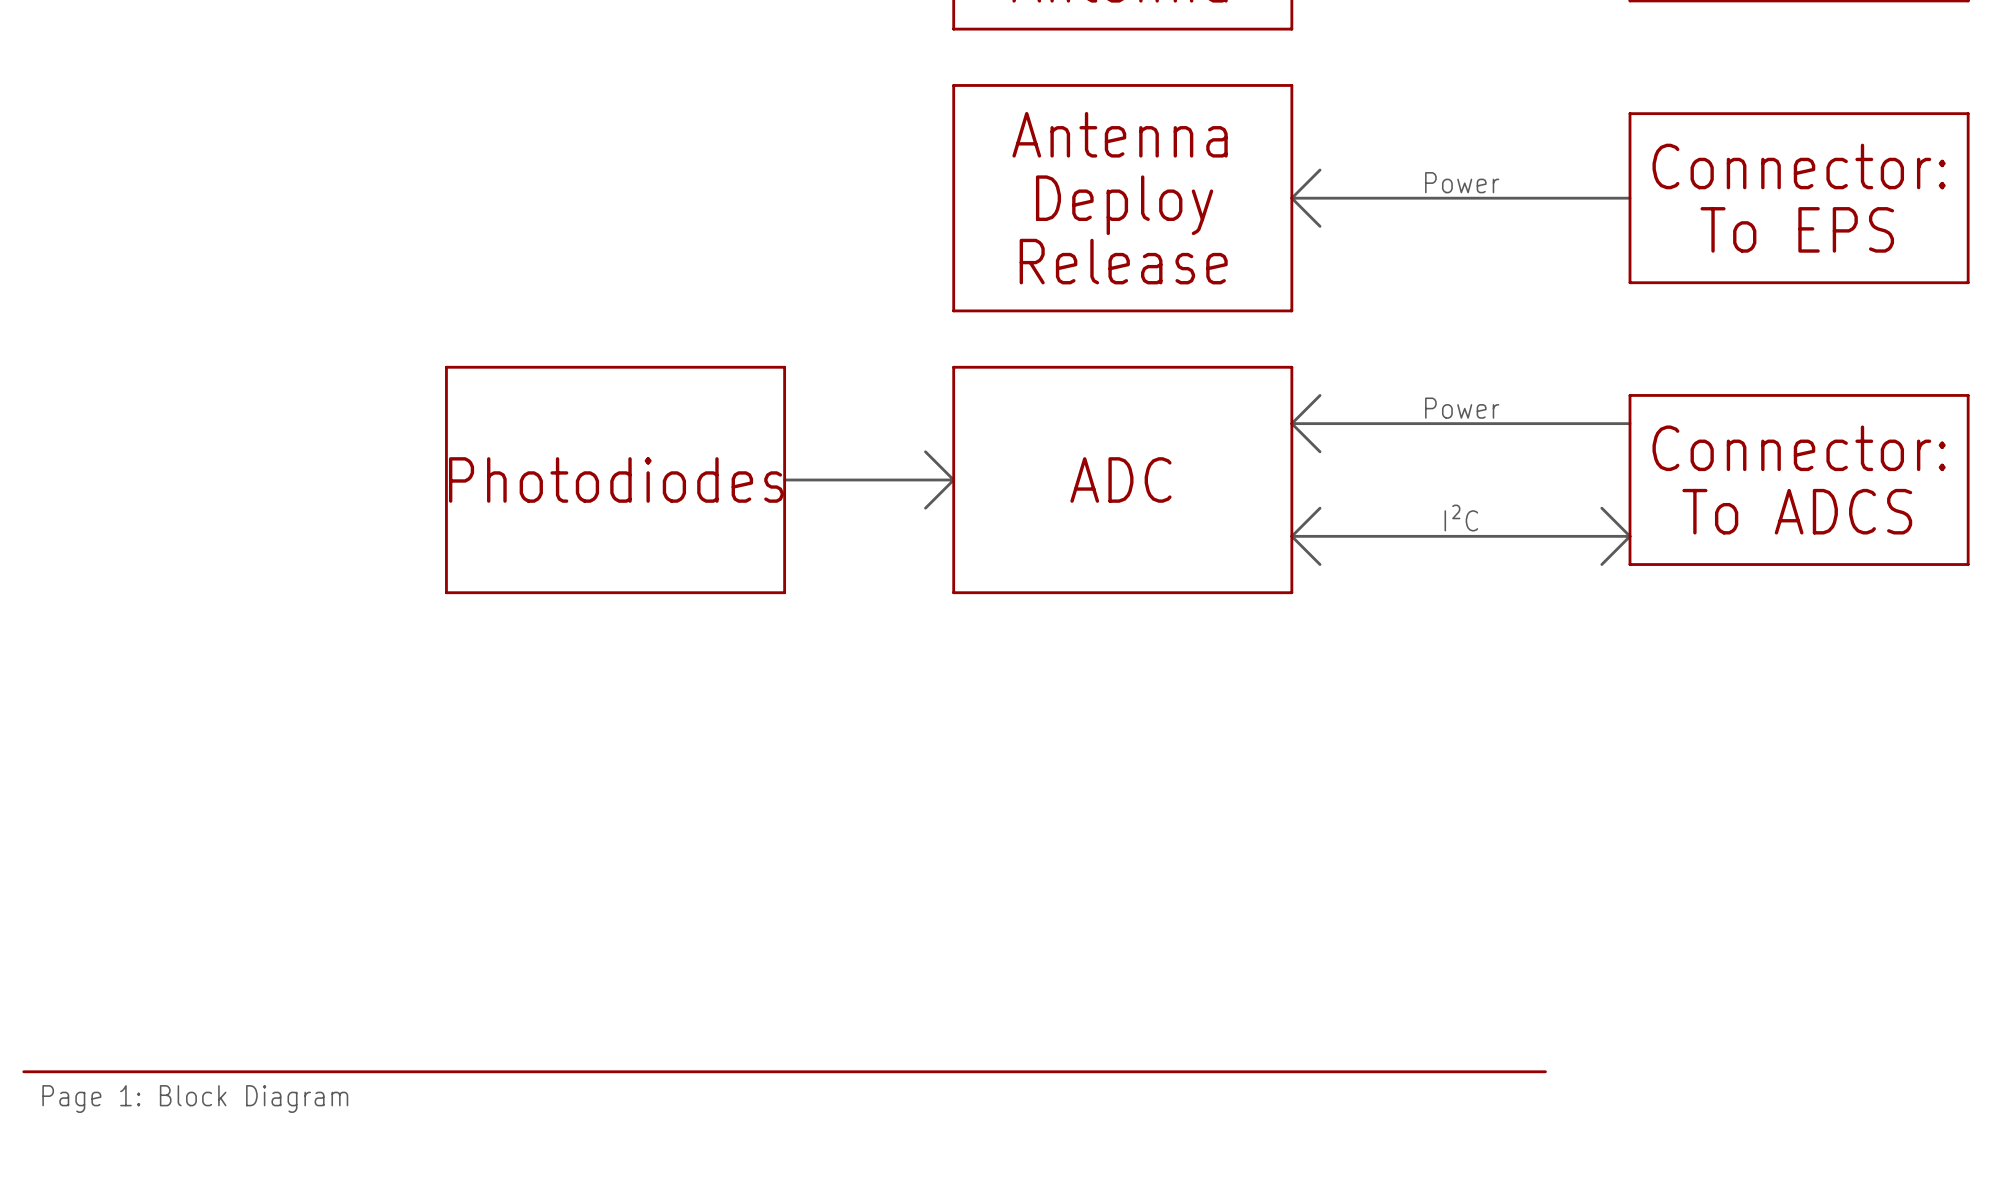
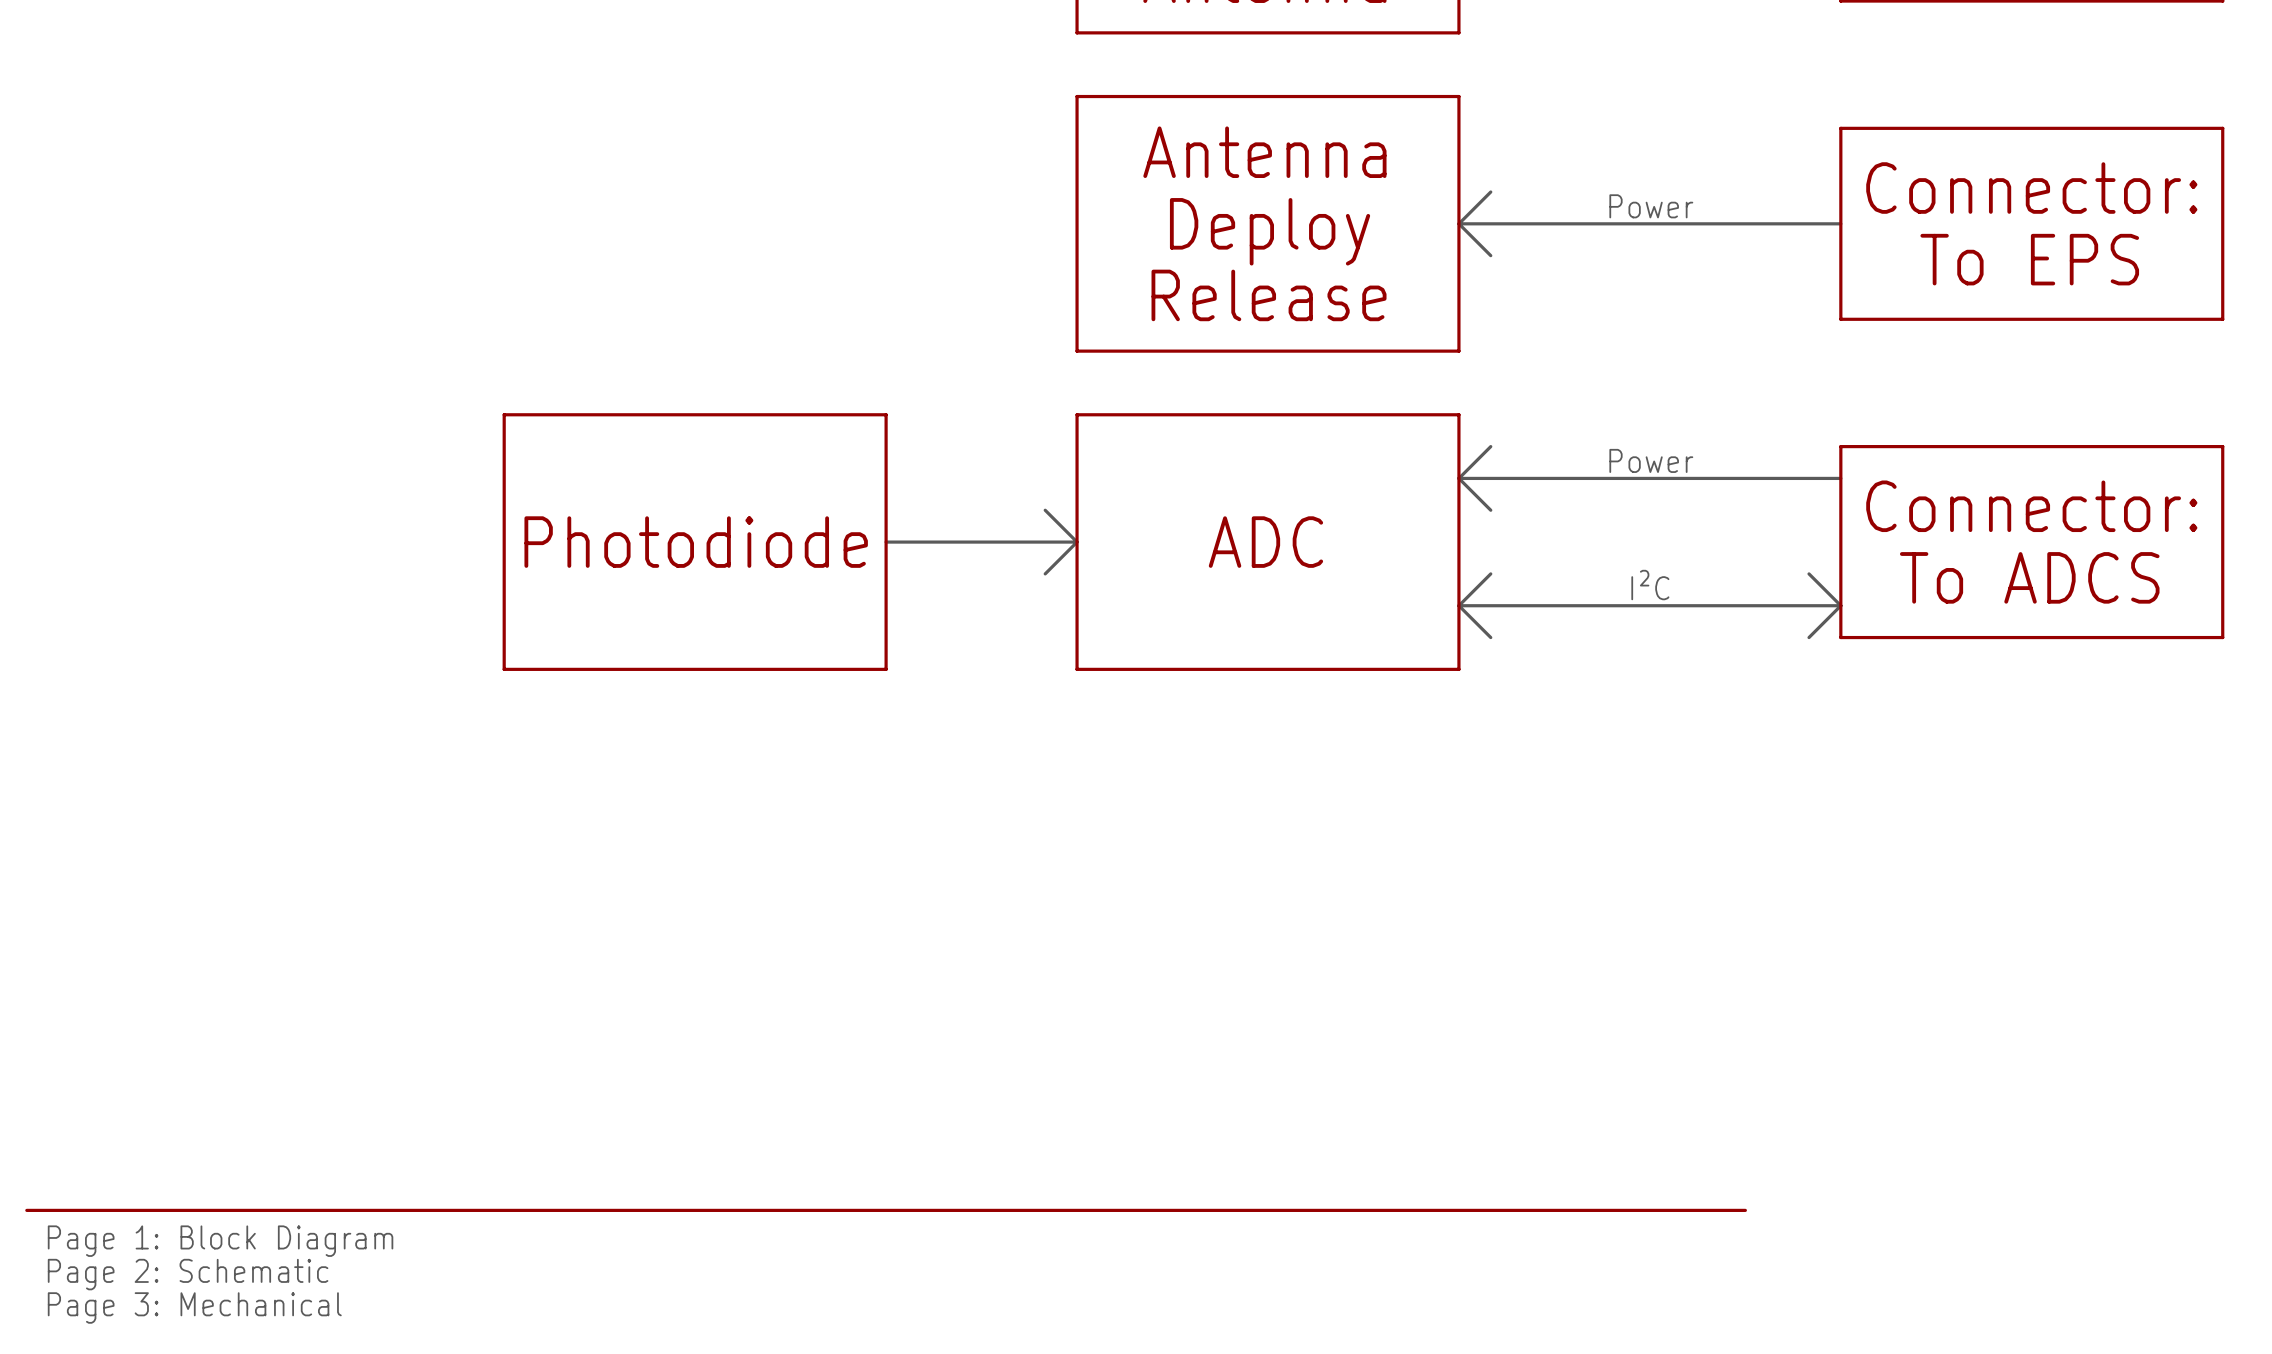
text: Photodiodes (616, 479) -> Photodiode (696, 542)
text: none -> Page 2: Schematic (188, 1274)
text: none -> Page 3: Mechanical (194, 1307)

